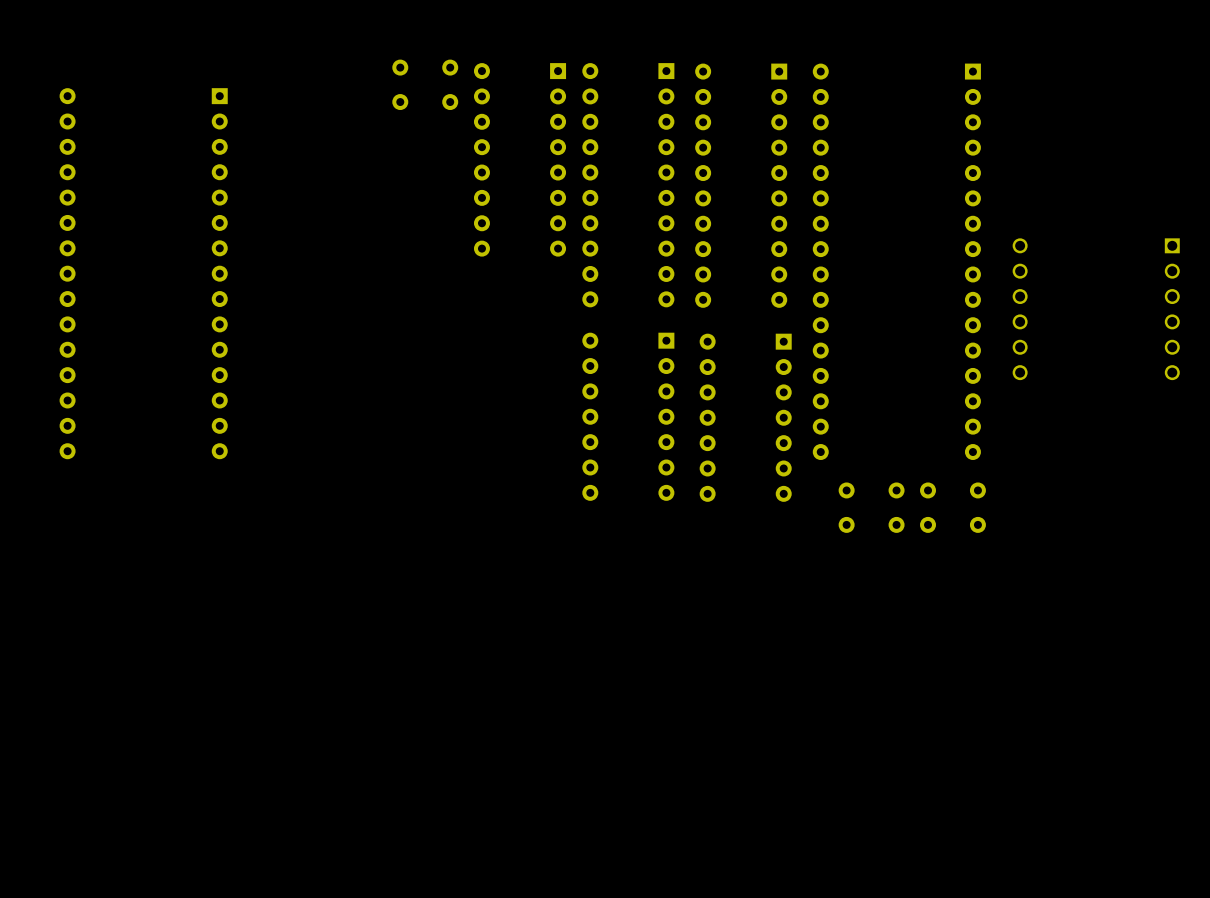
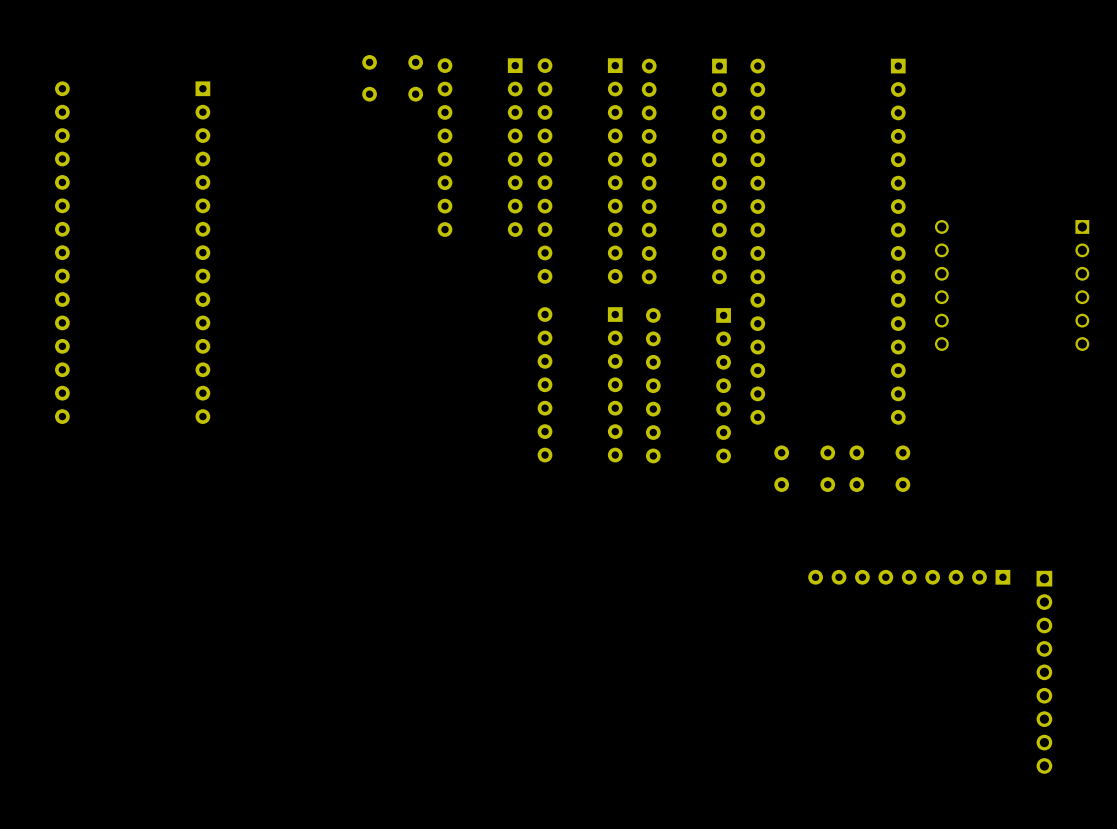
part: none -> (909, 577)
part: none -> (1044, 672)

